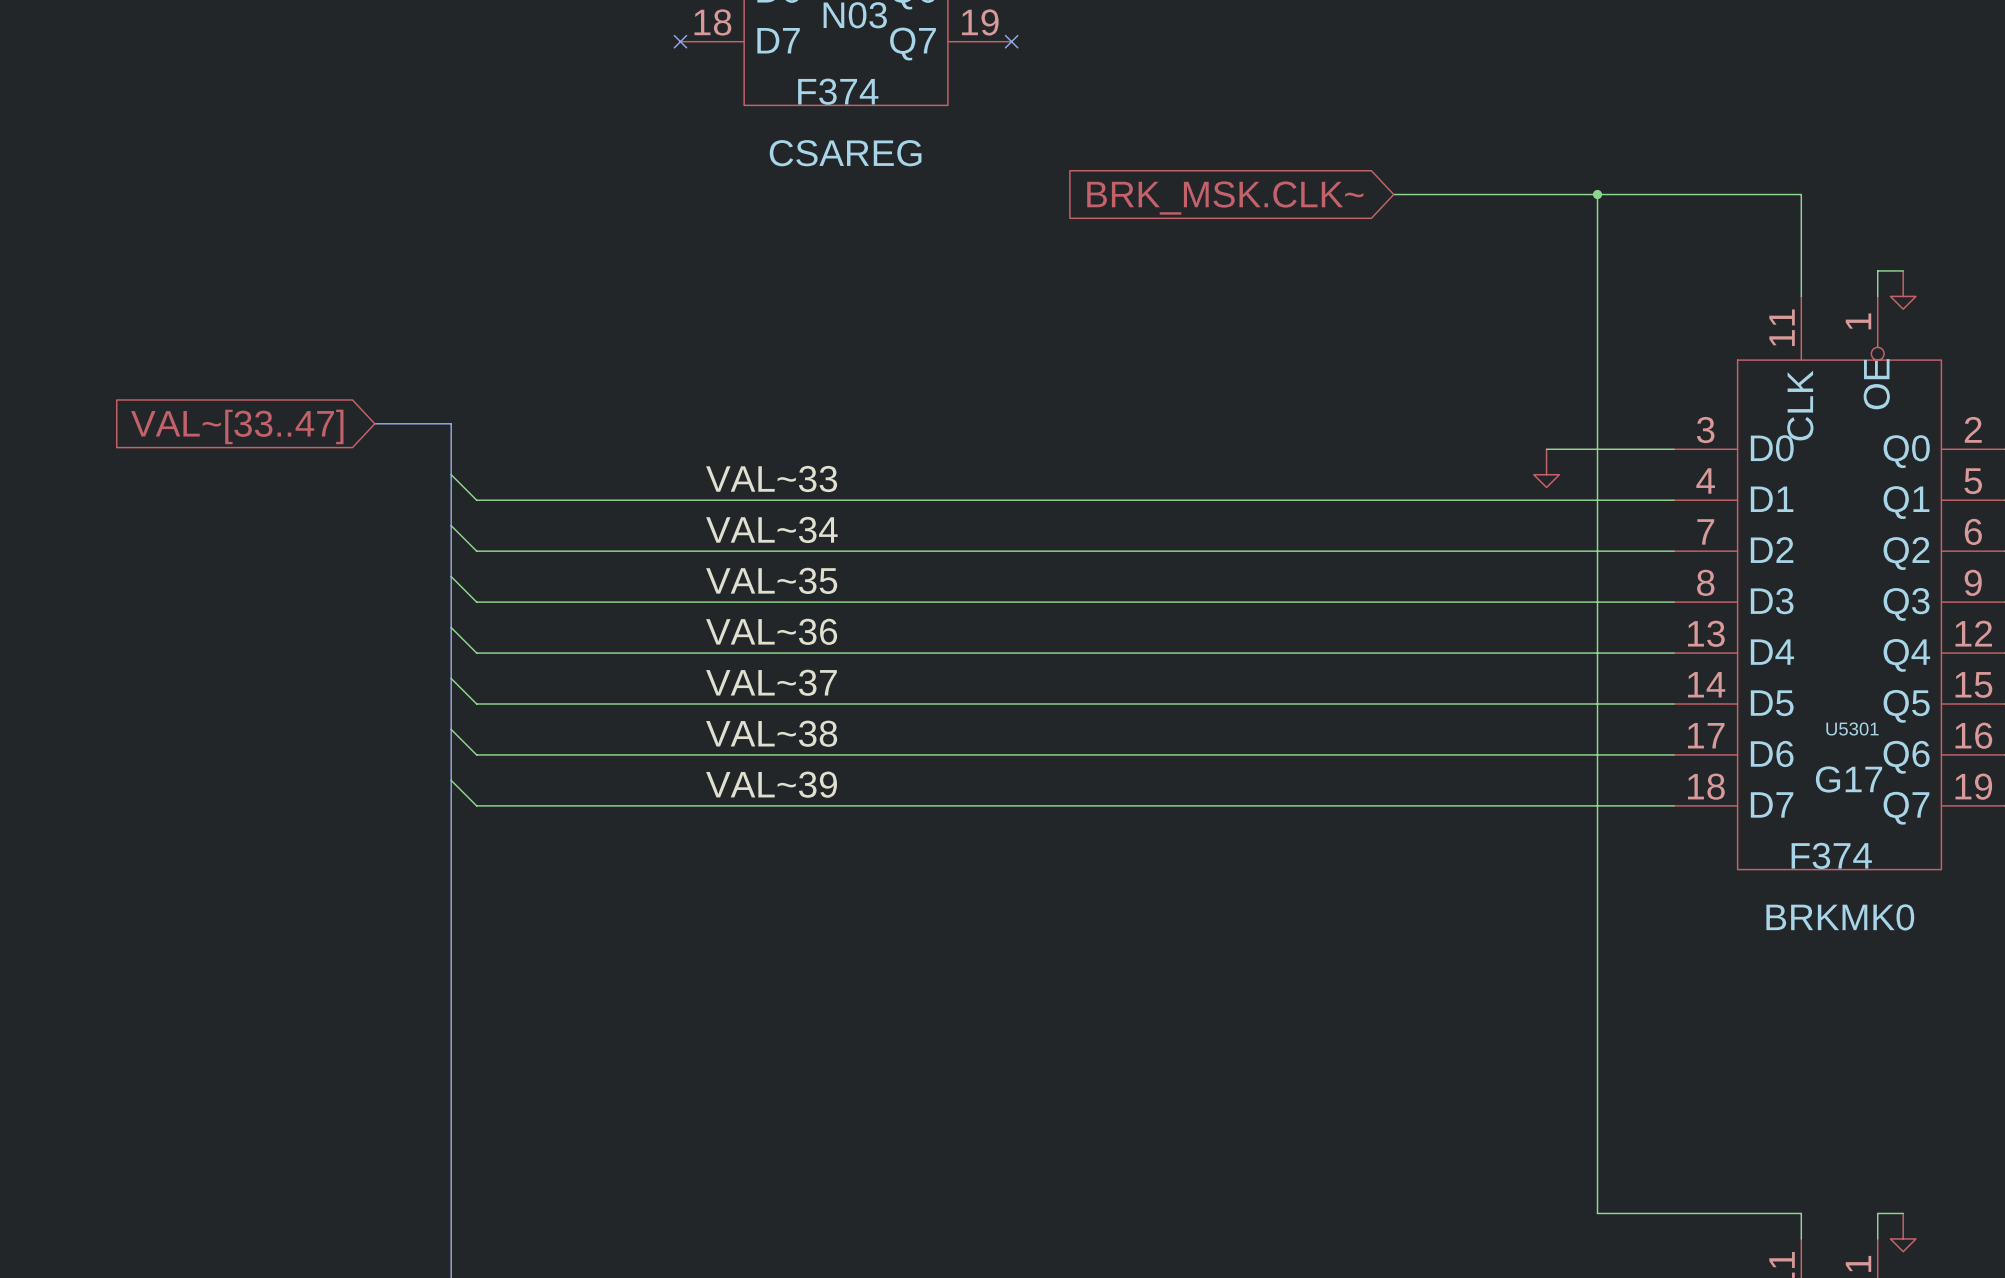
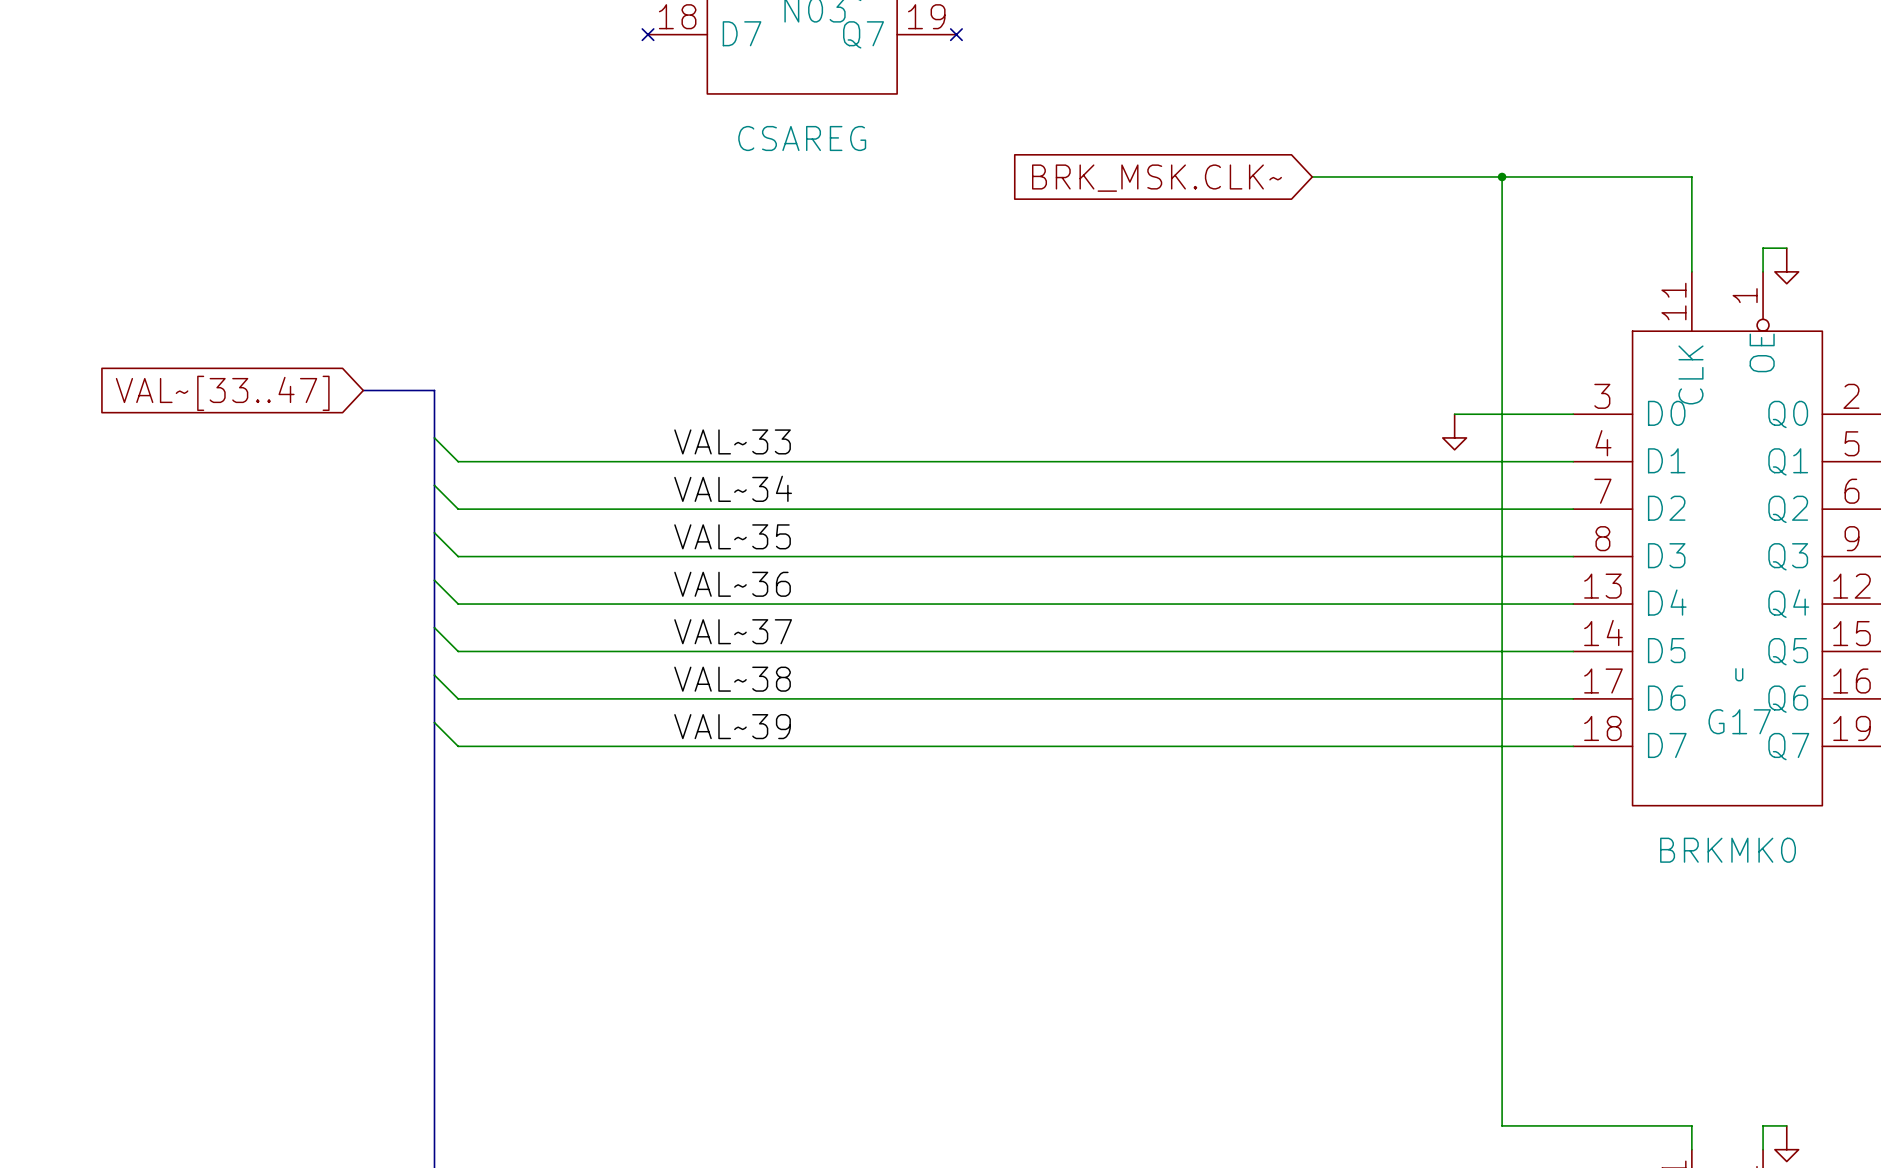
part value: F374 (838, 91) -> none
U5301 name: U5301 (1852, 728) -> U (1739, 674)
U5301 value: F374 (1831, 855) -> none

